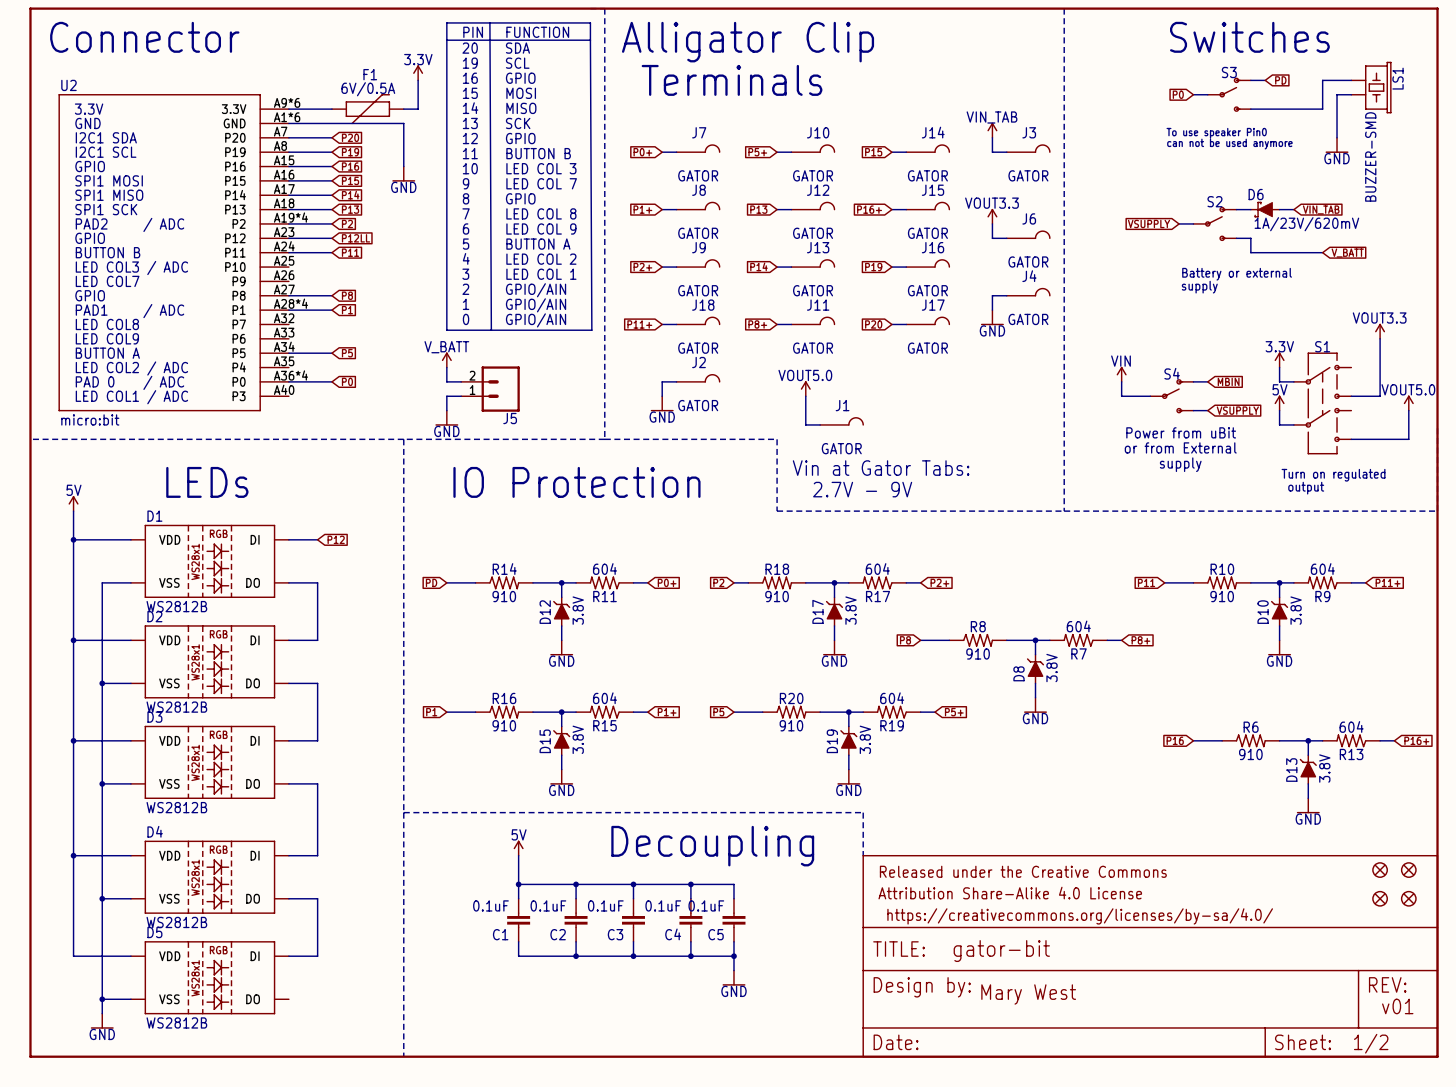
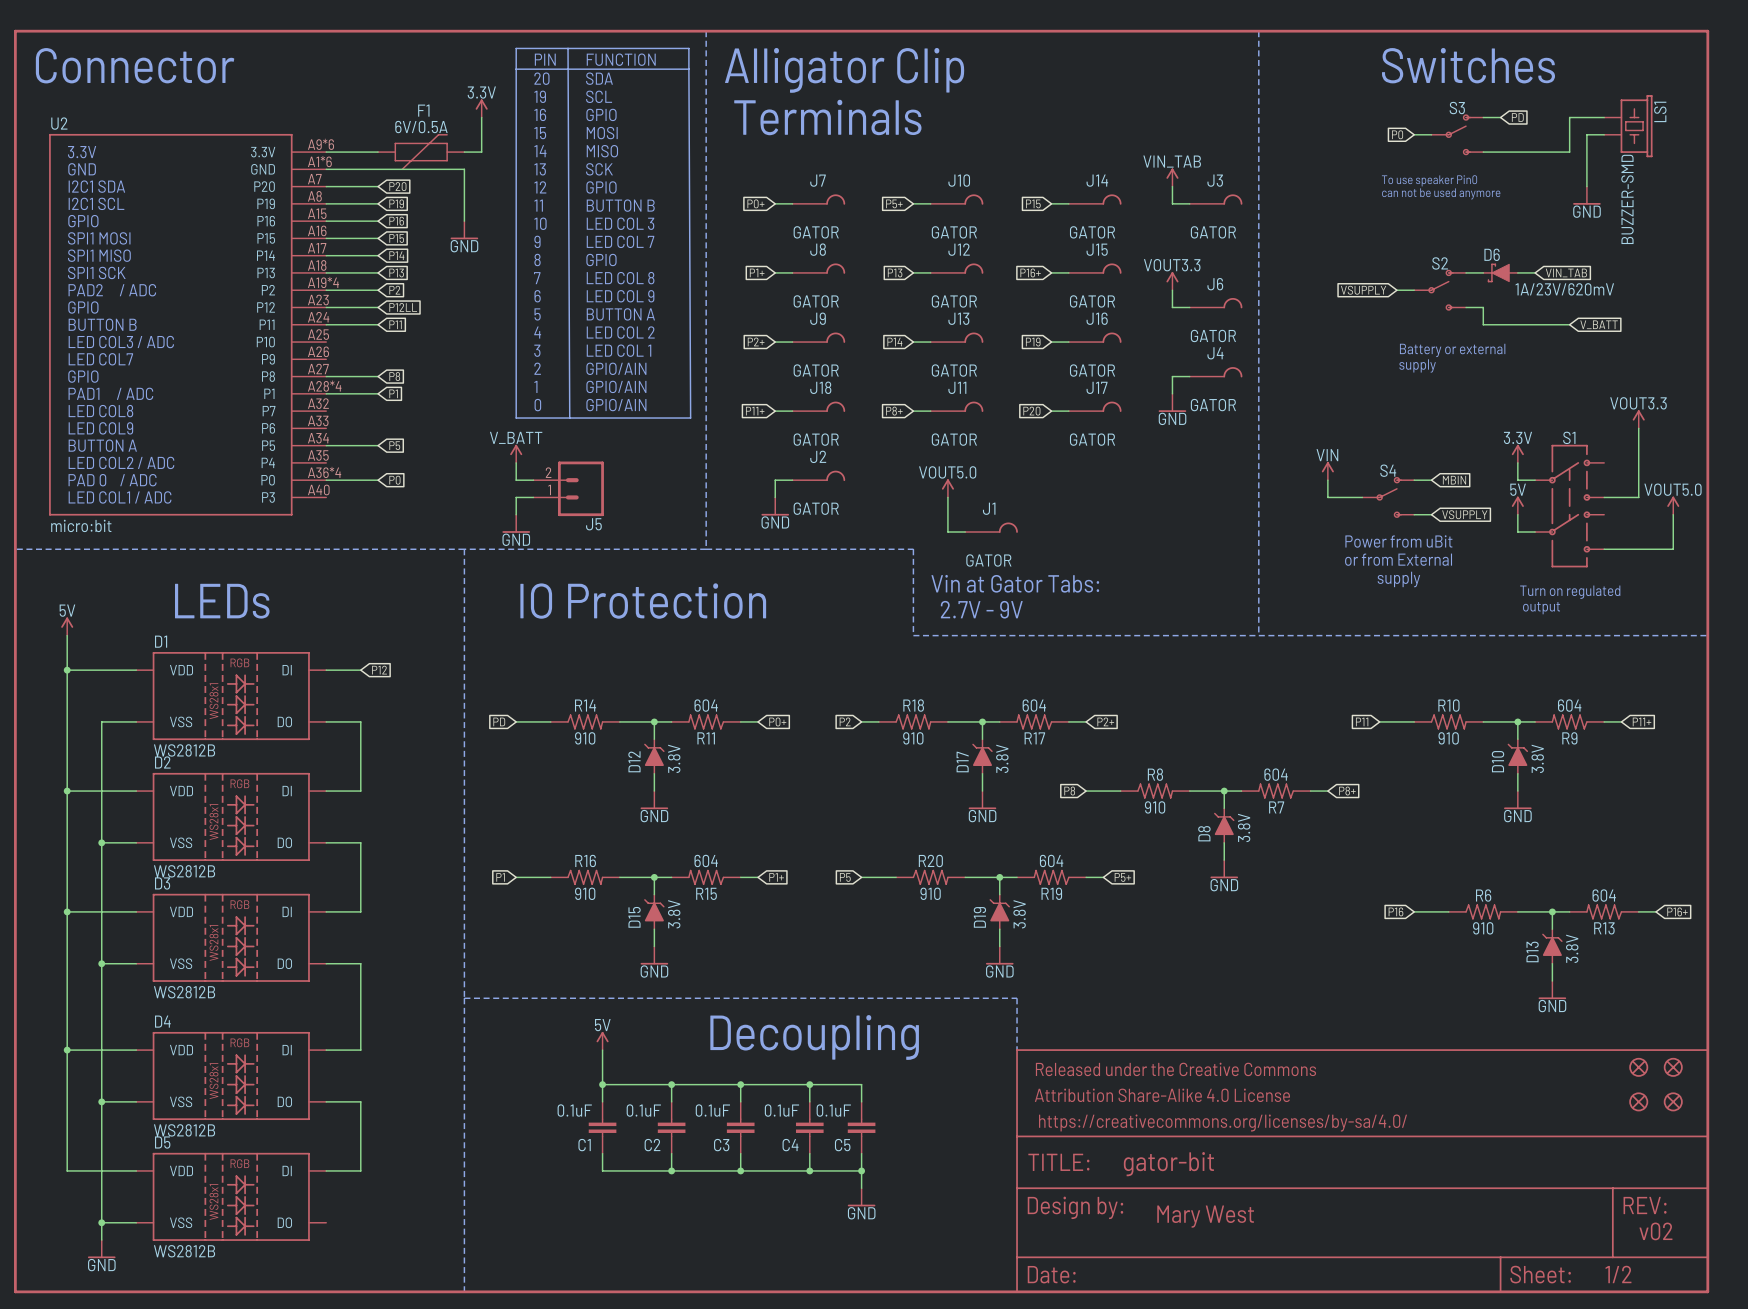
text: v01 (1397, 1006) -> v02 (1655, 1231)

